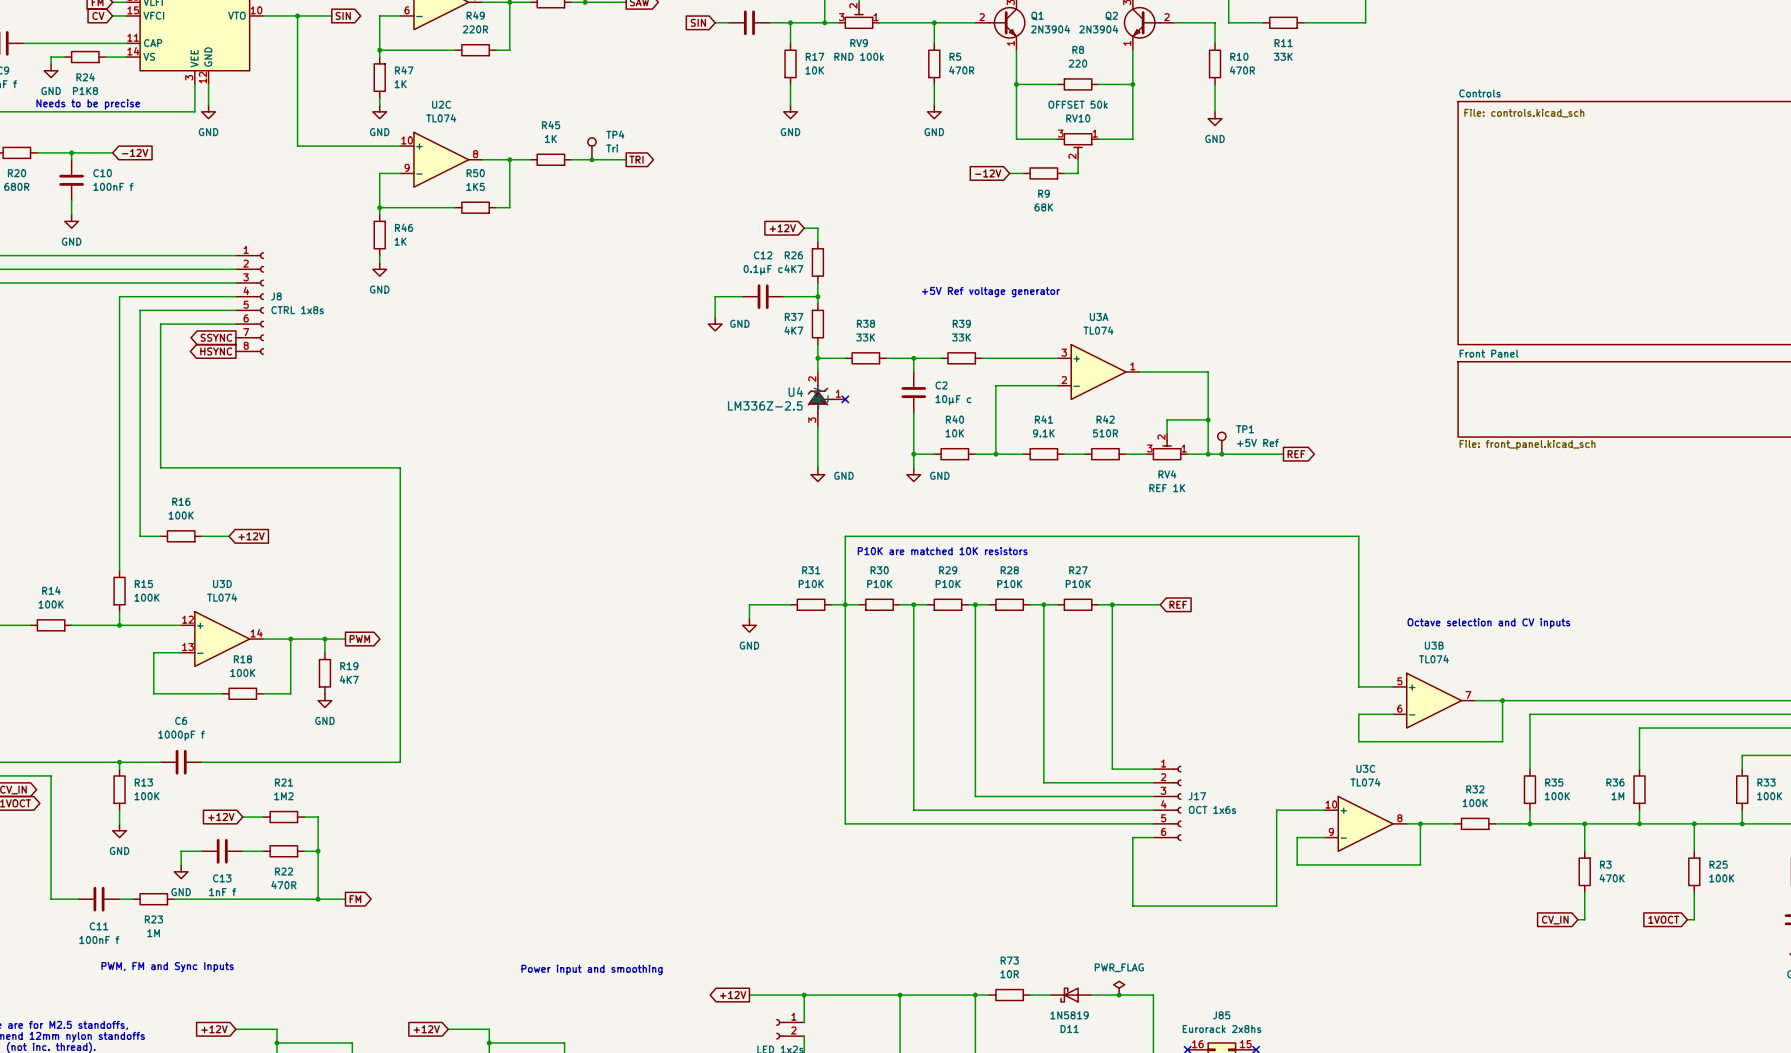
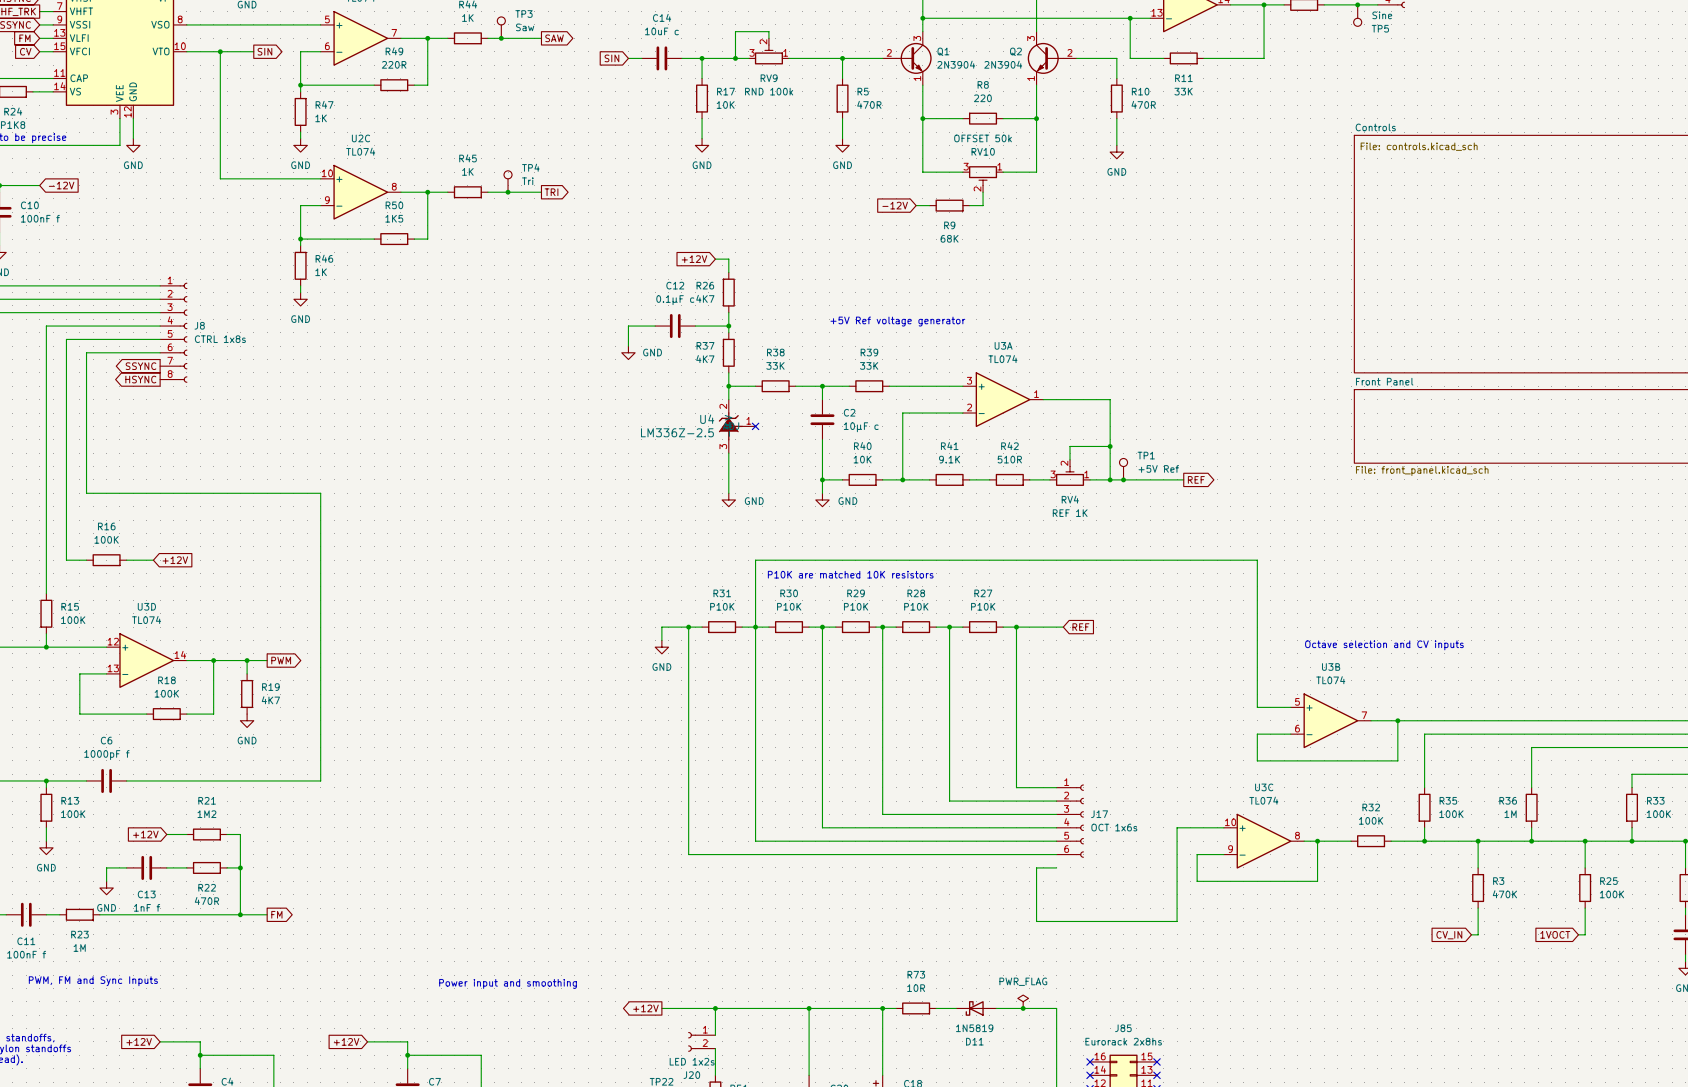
wire: none -> (688, 627) (688, 854) (1036, 854)
junction: none -> (688, 627)
wire: (1132, 837) (1132, 851) -> (1056, 867) (1036, 867)

